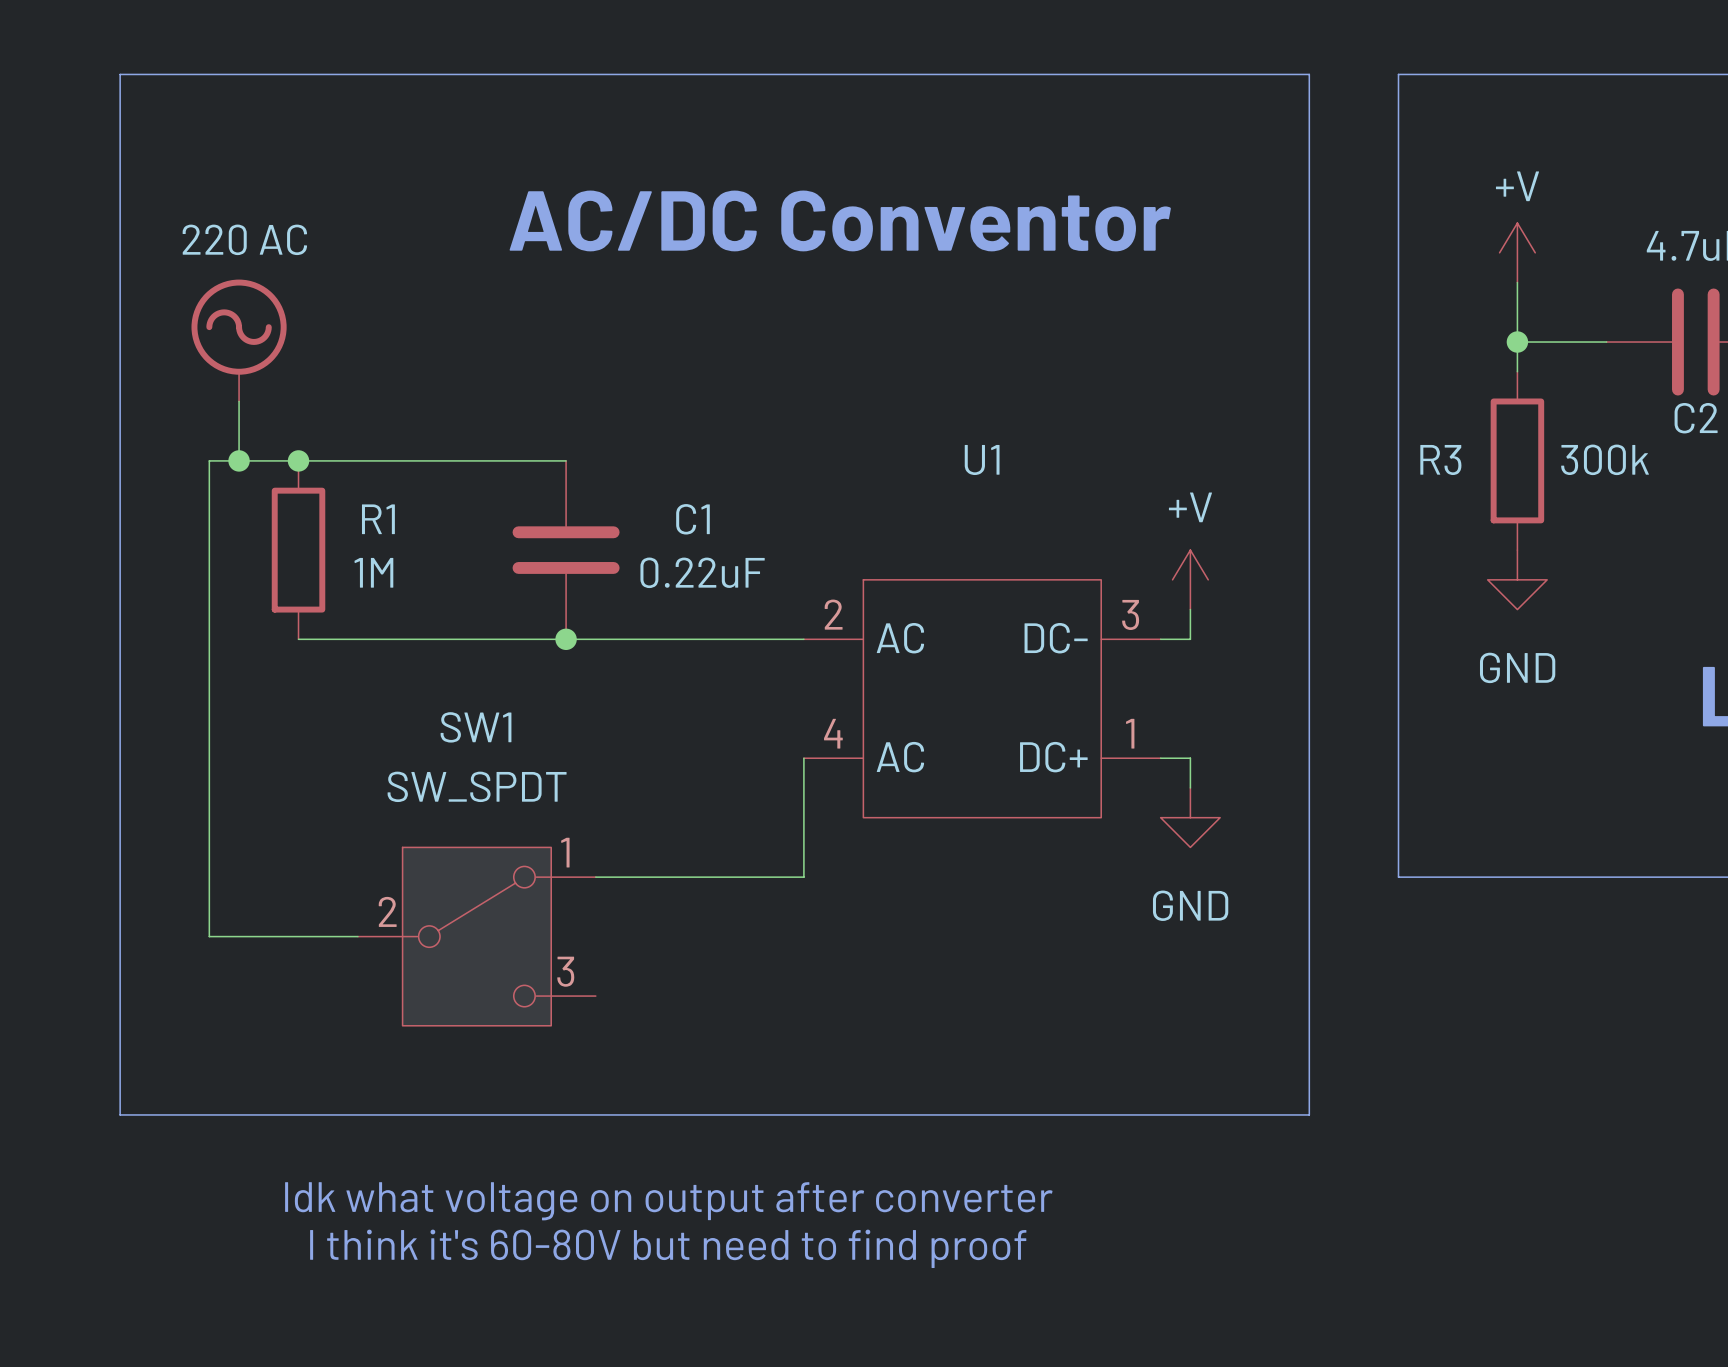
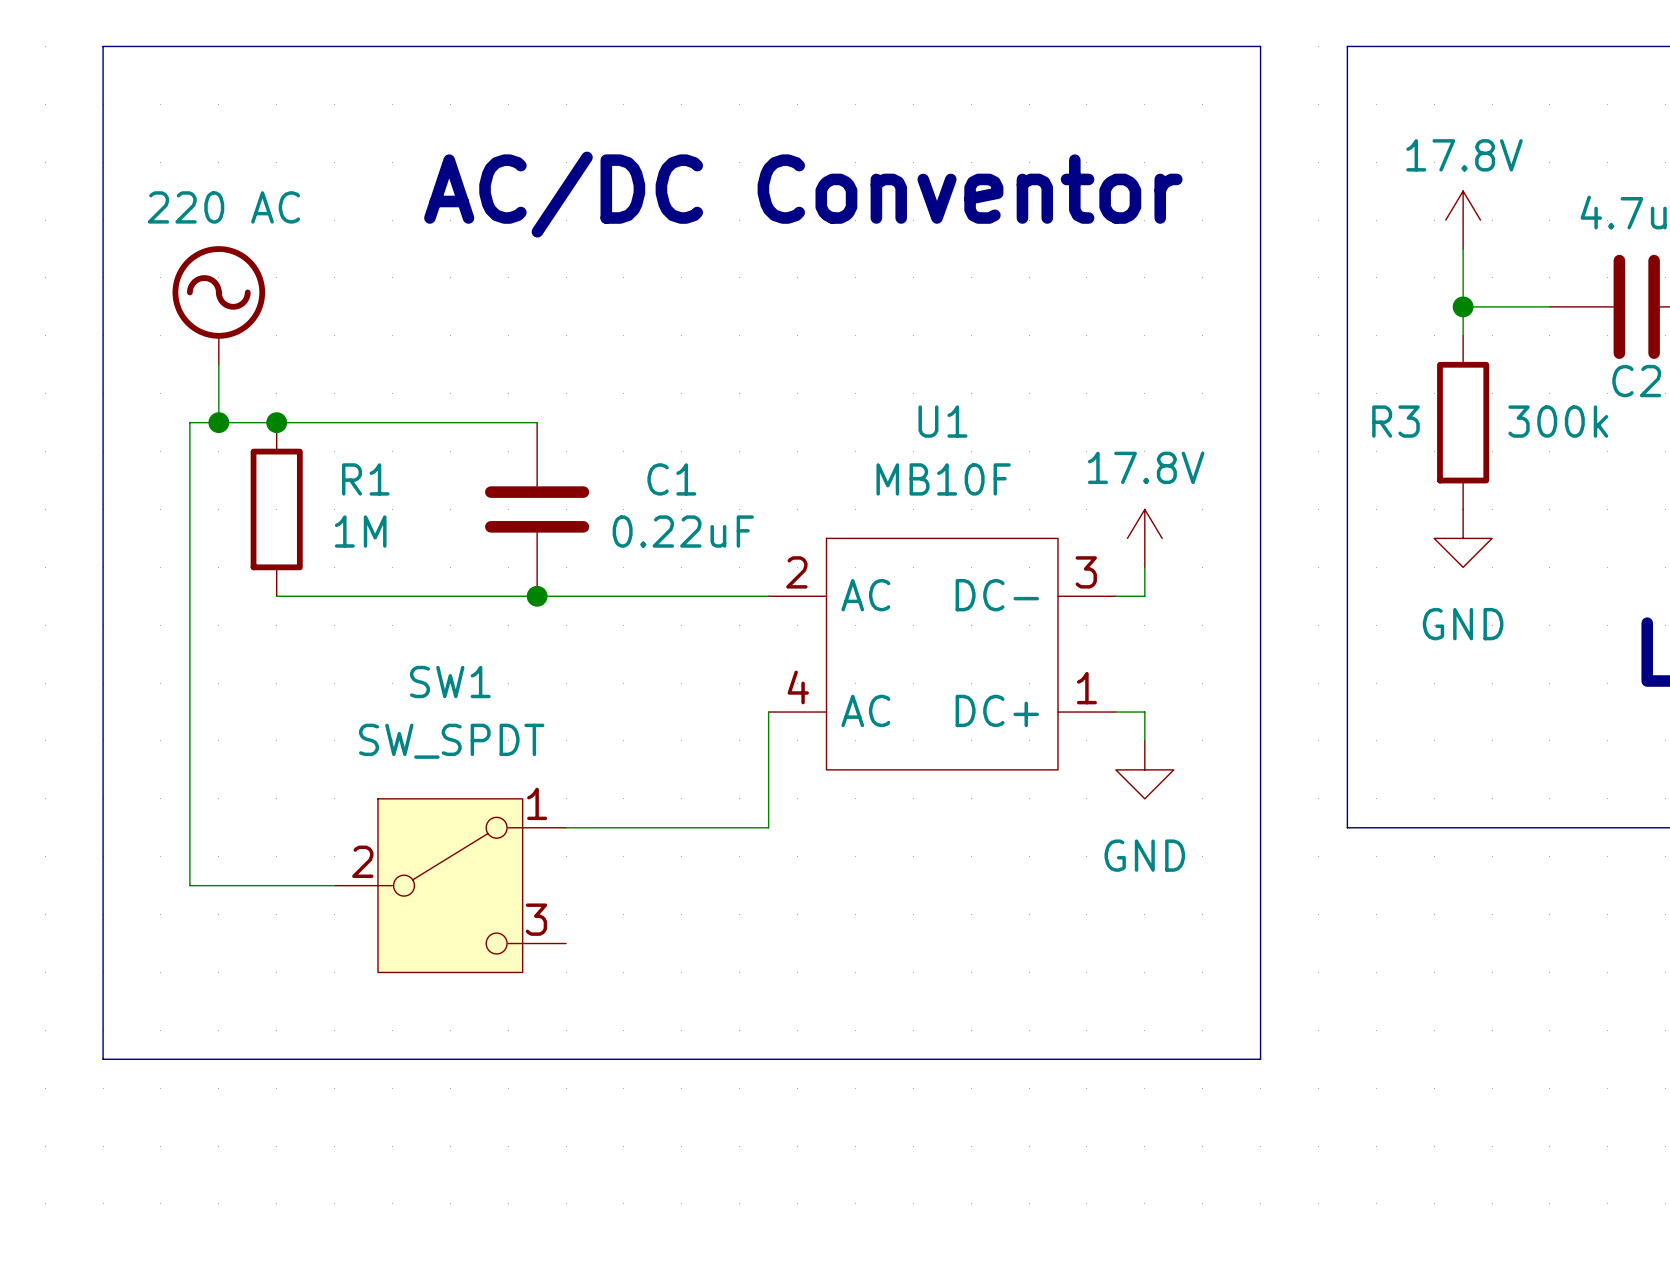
power symbol: +V (1517, 252) -> 17.8V (1463, 220)
U1 value: none -> MB10F (943, 479)
power symbol: +V (1190, 579) -> 17.8V (1144, 538)
text: Idk what voltage on output after converter (668, 1201) -> none
text: I think it's 60-80V but need to find proof (668, 1248) -> none

